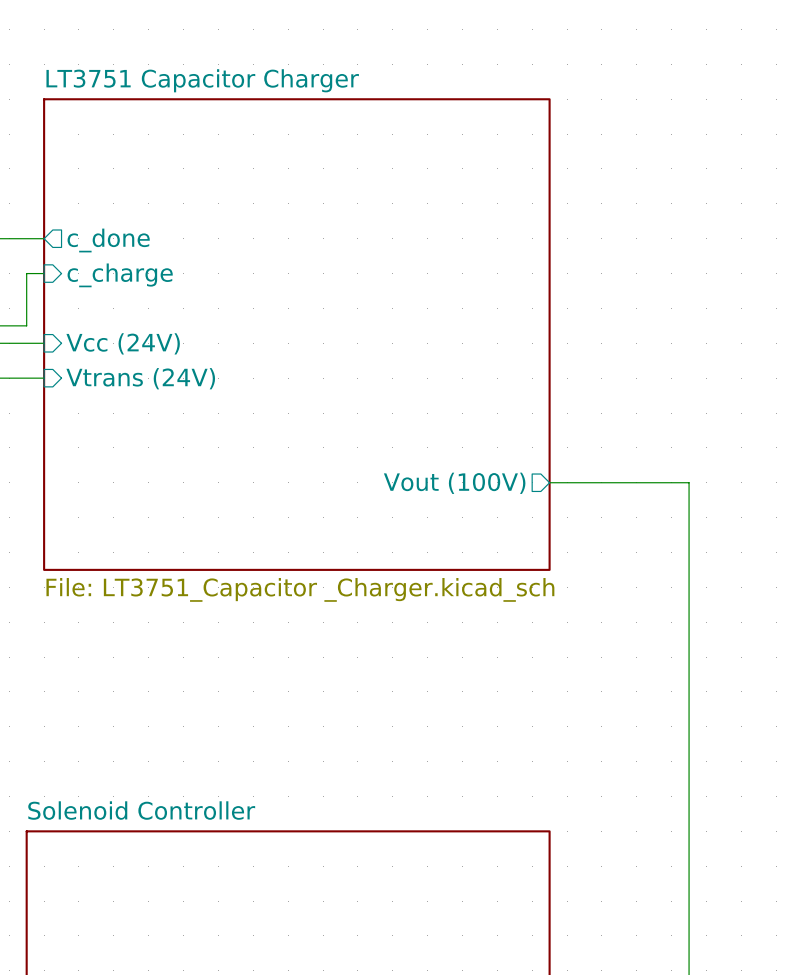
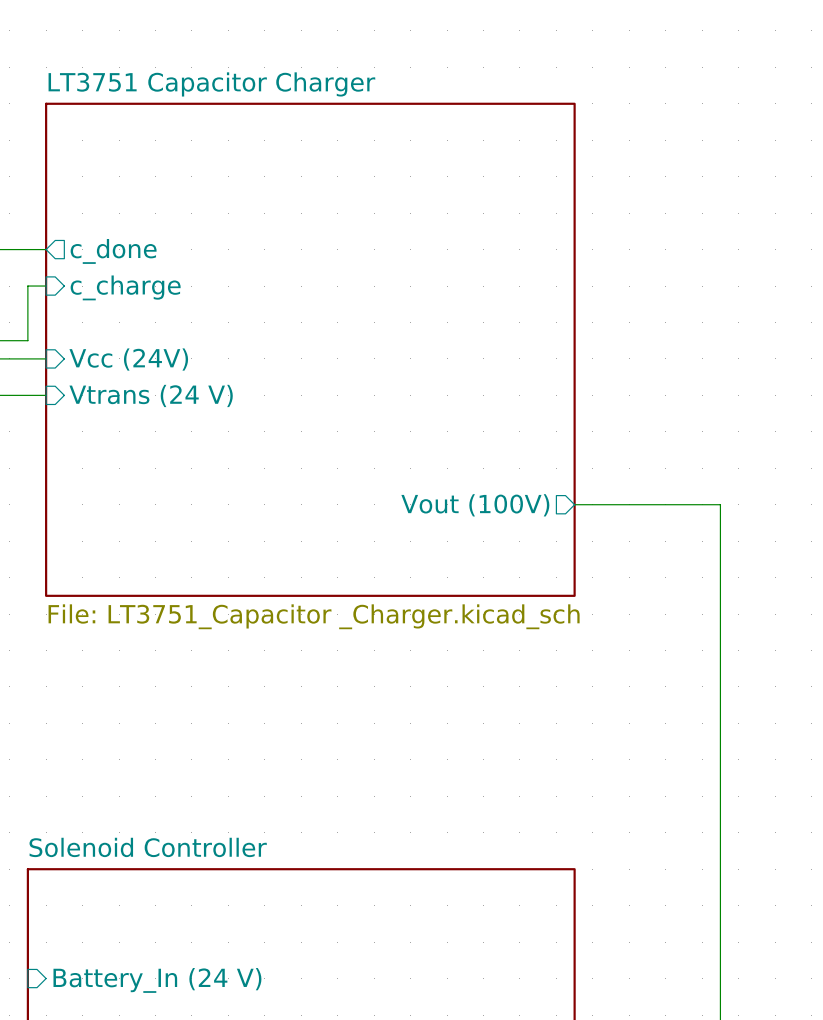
sheet pin: Vtrans (24V) (140, 378) -> Vtrans (24 V) (151, 395)
sheet pin: none -> Battery_In (24 V) (157, 980)

